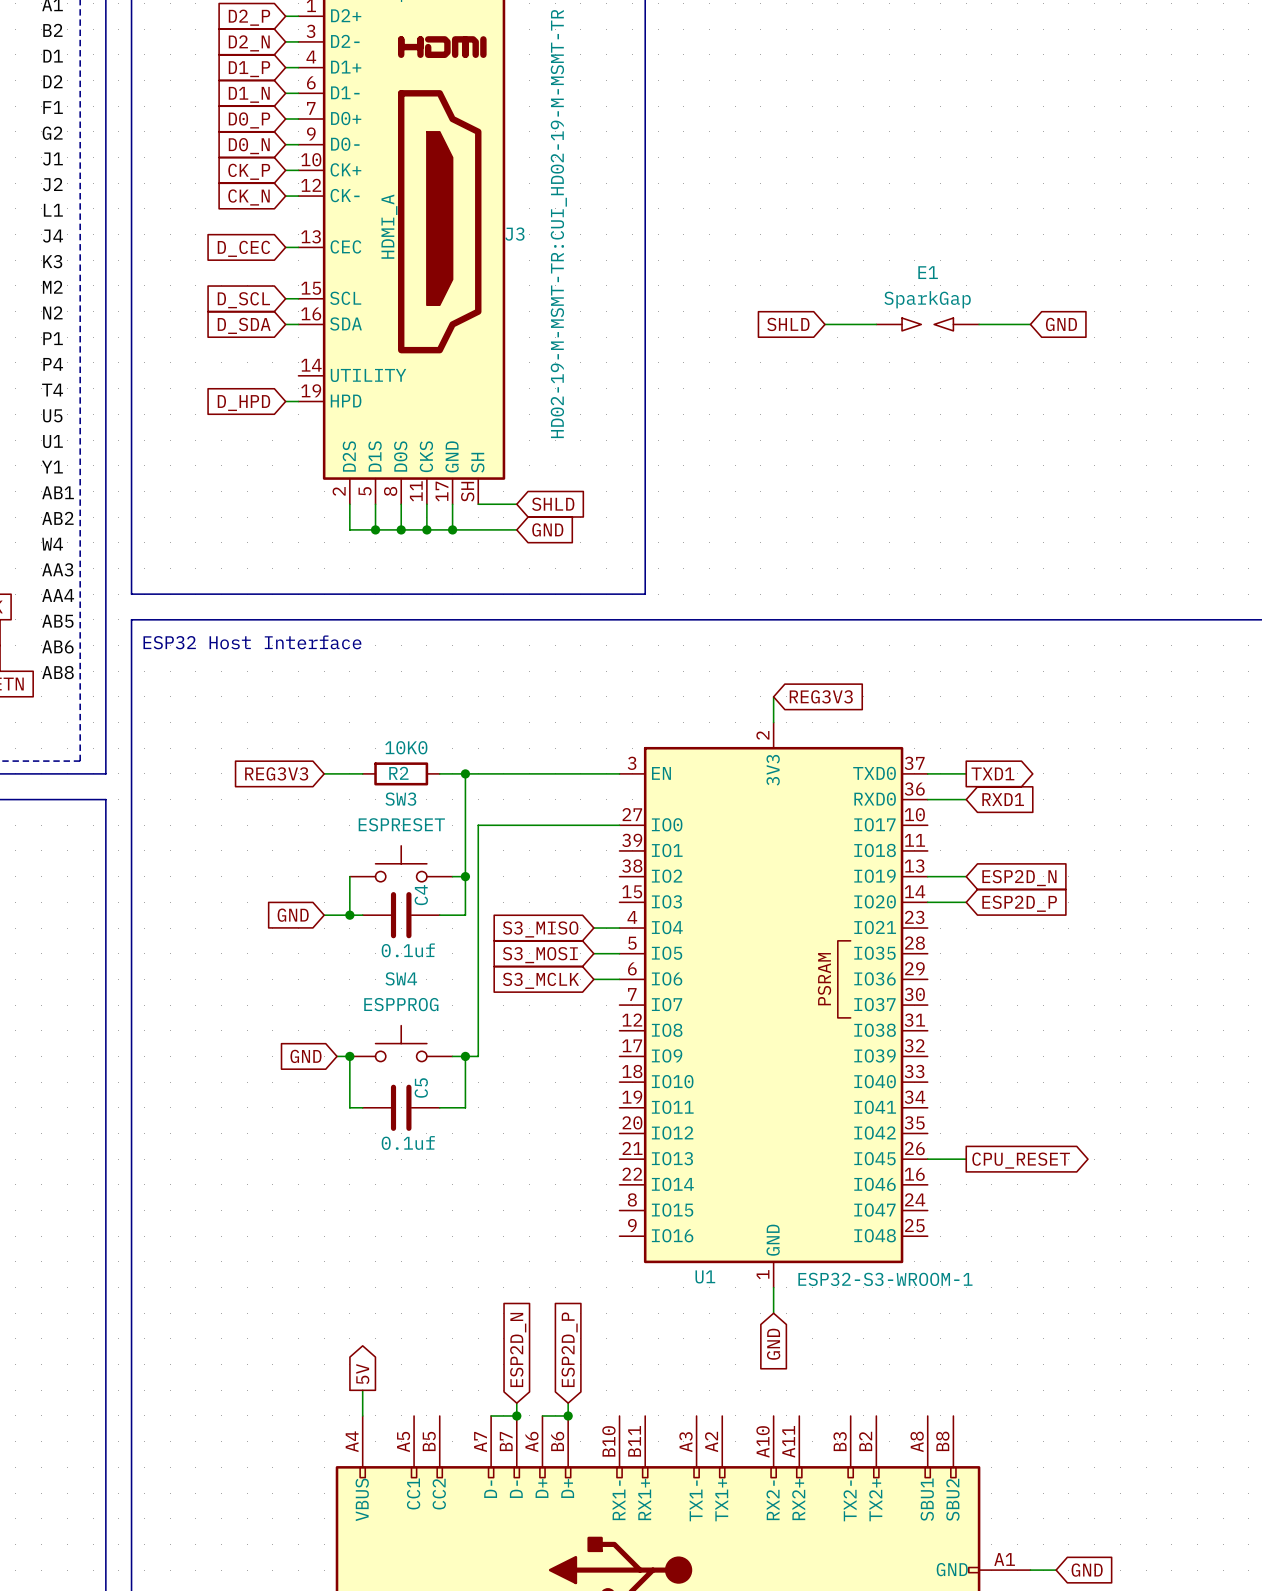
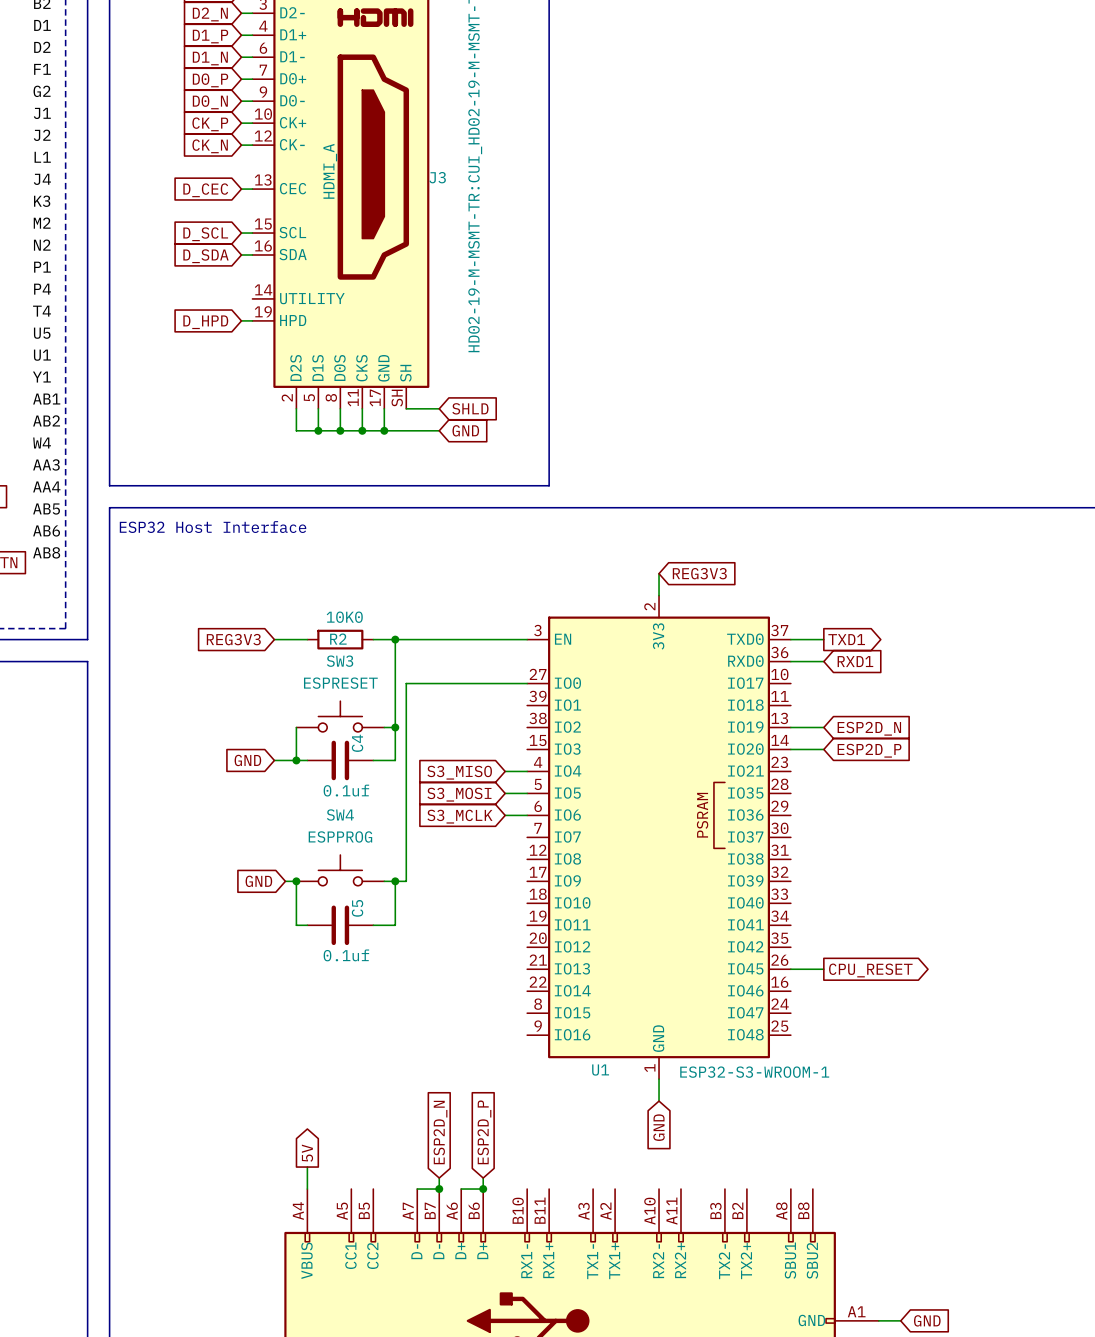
global label: SHLD (788, 324) -> none
wire: (824, 324) (876, 324) -> none
E1: SparkGap (927, 324) -> none
wire: (979, 324) (1030, 324) -> none
global label: GND (1061, 324) -> none

